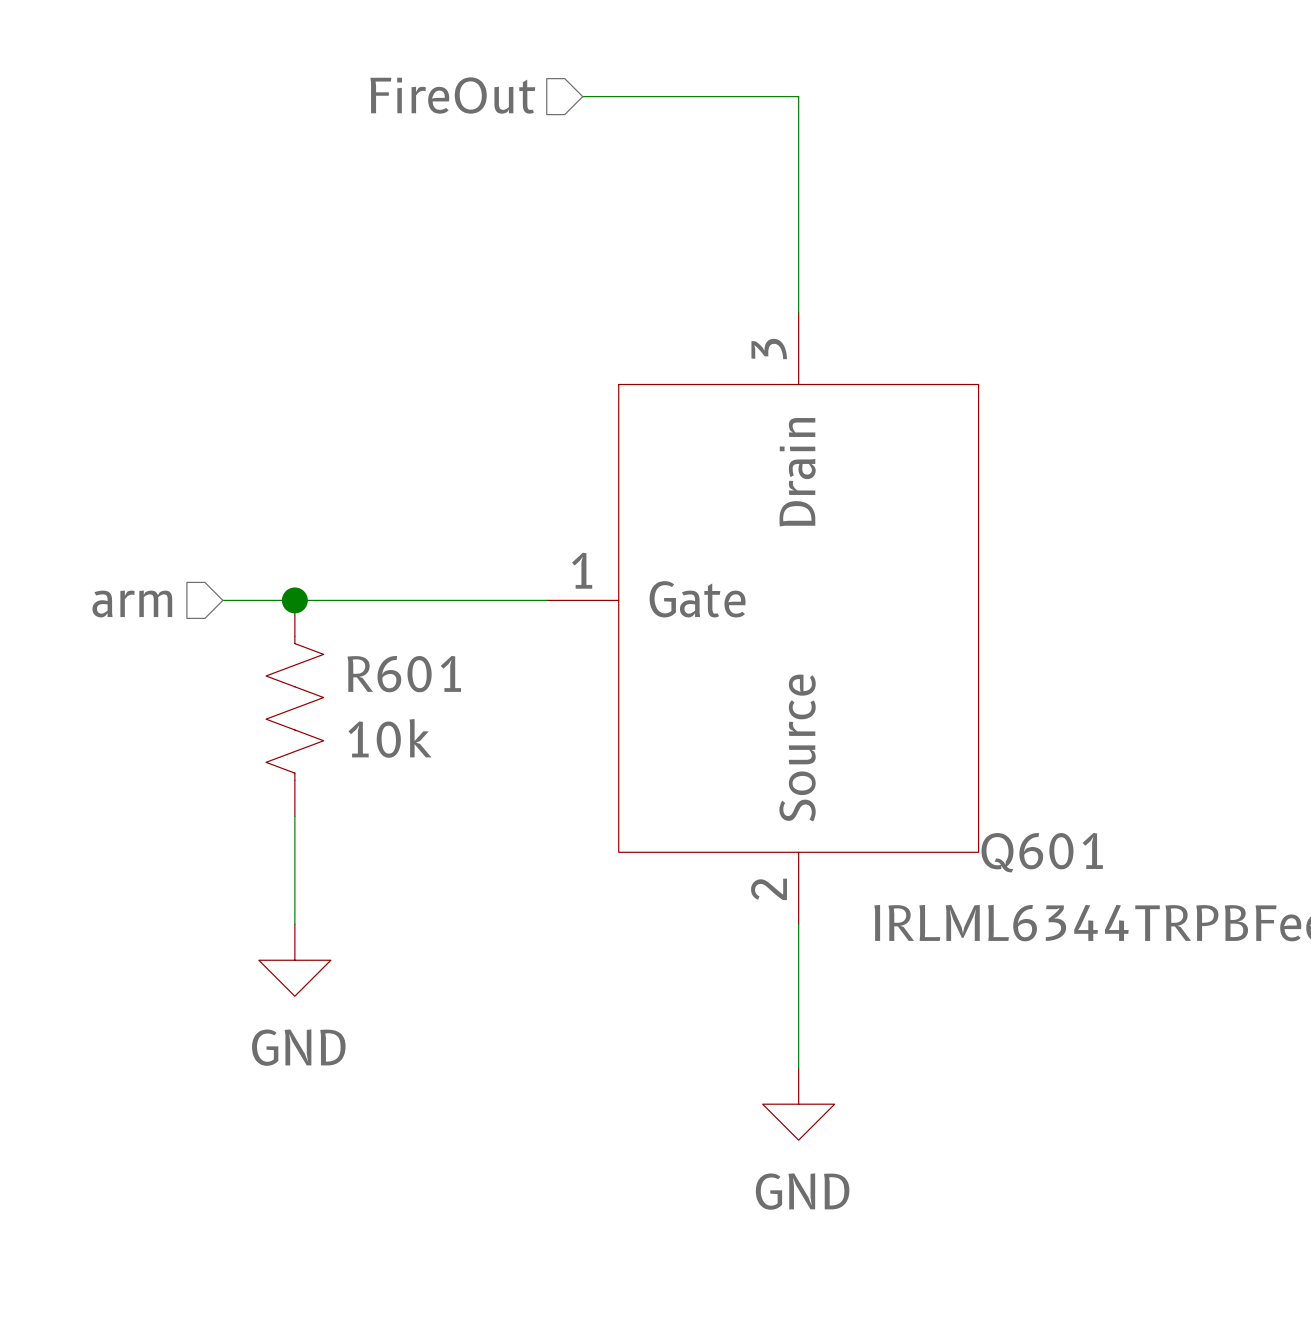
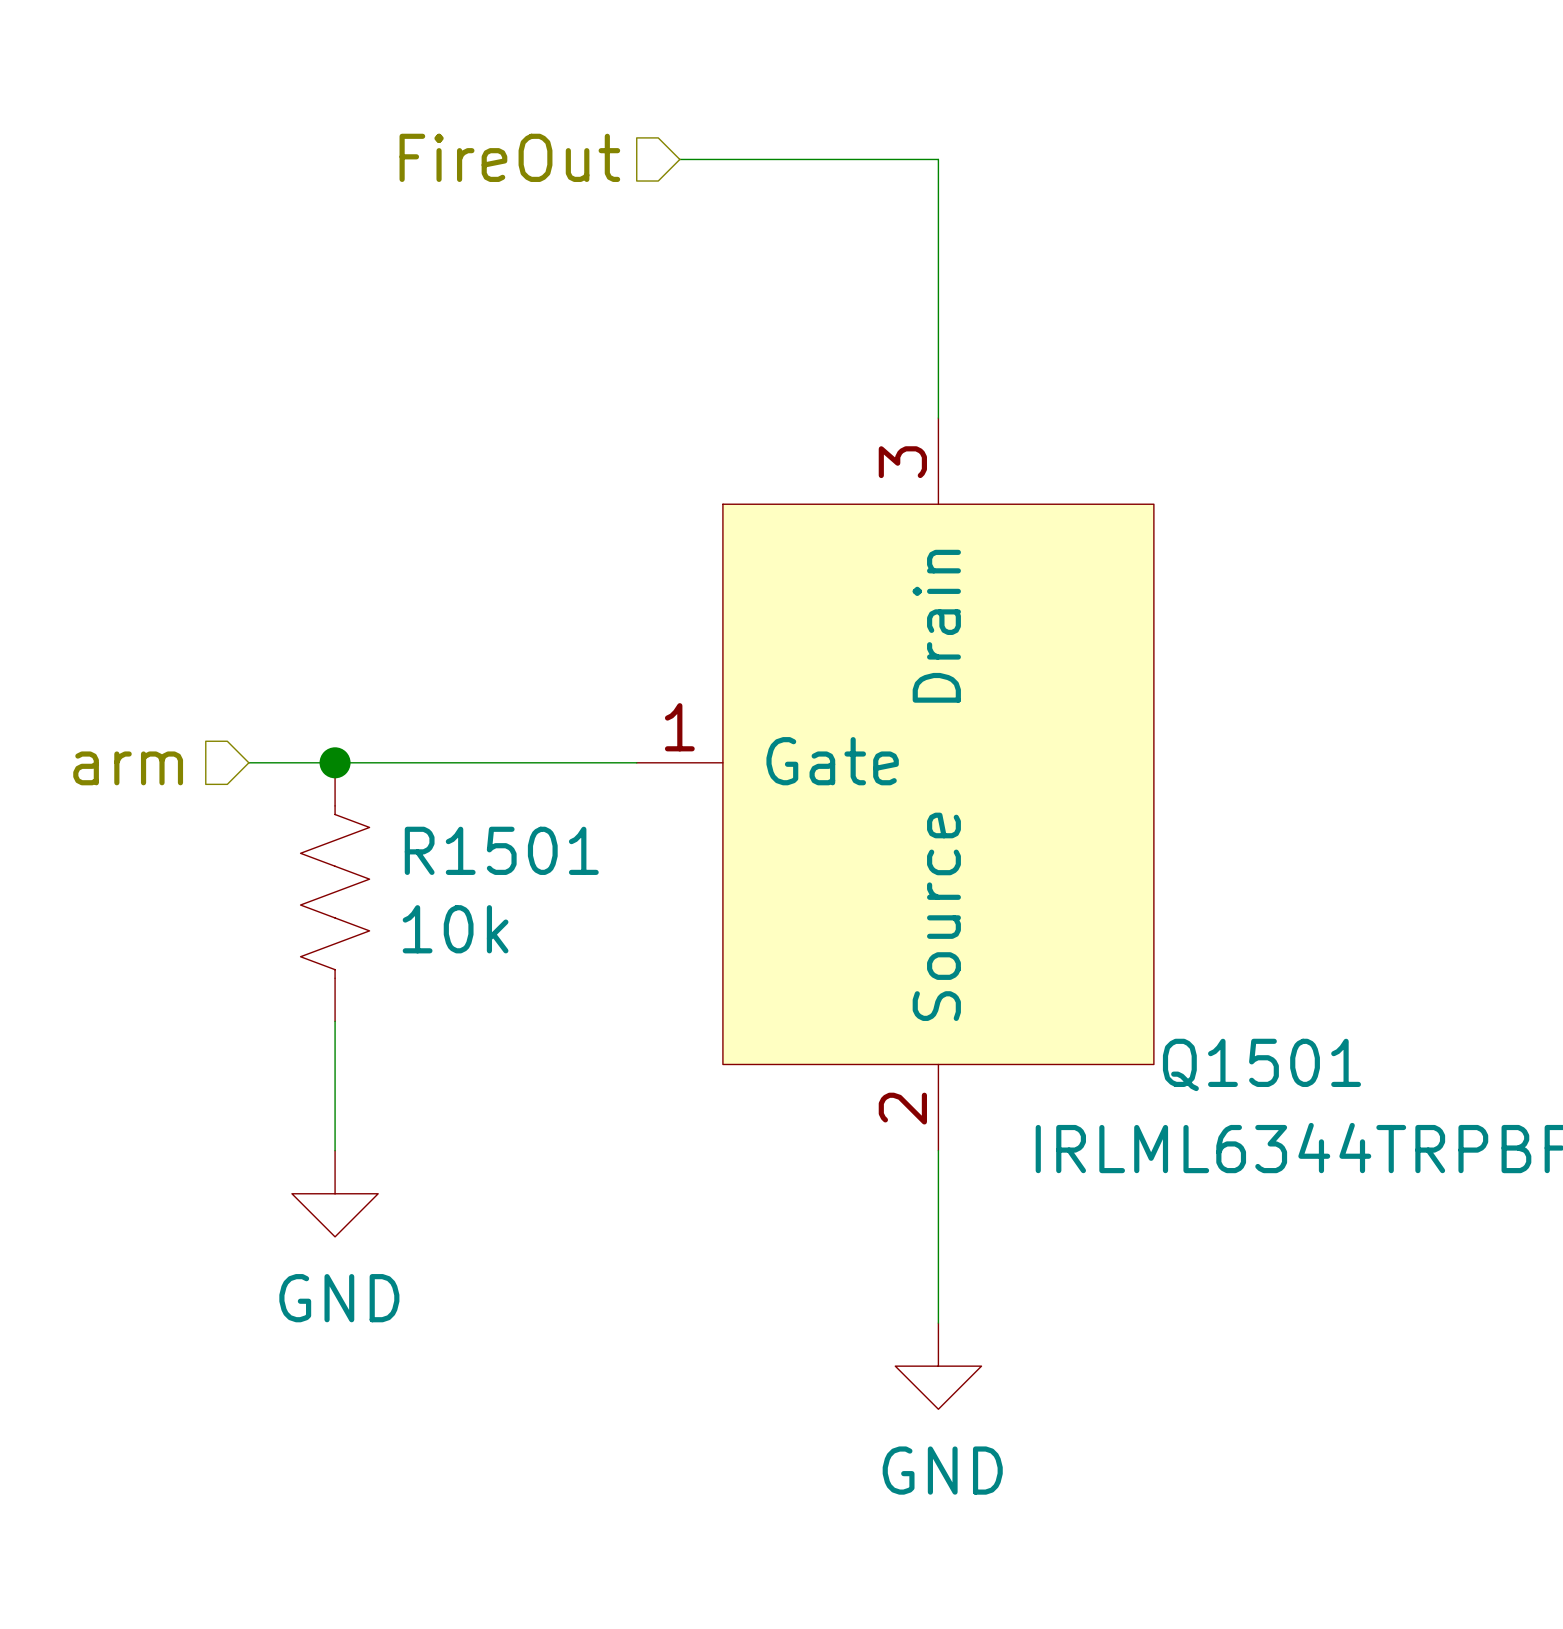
R601 name: R601 (404, 674) -> R1501 (501, 850)
Q601 name: Q601 (1042, 852) -> Q1501 (1261, 1064)

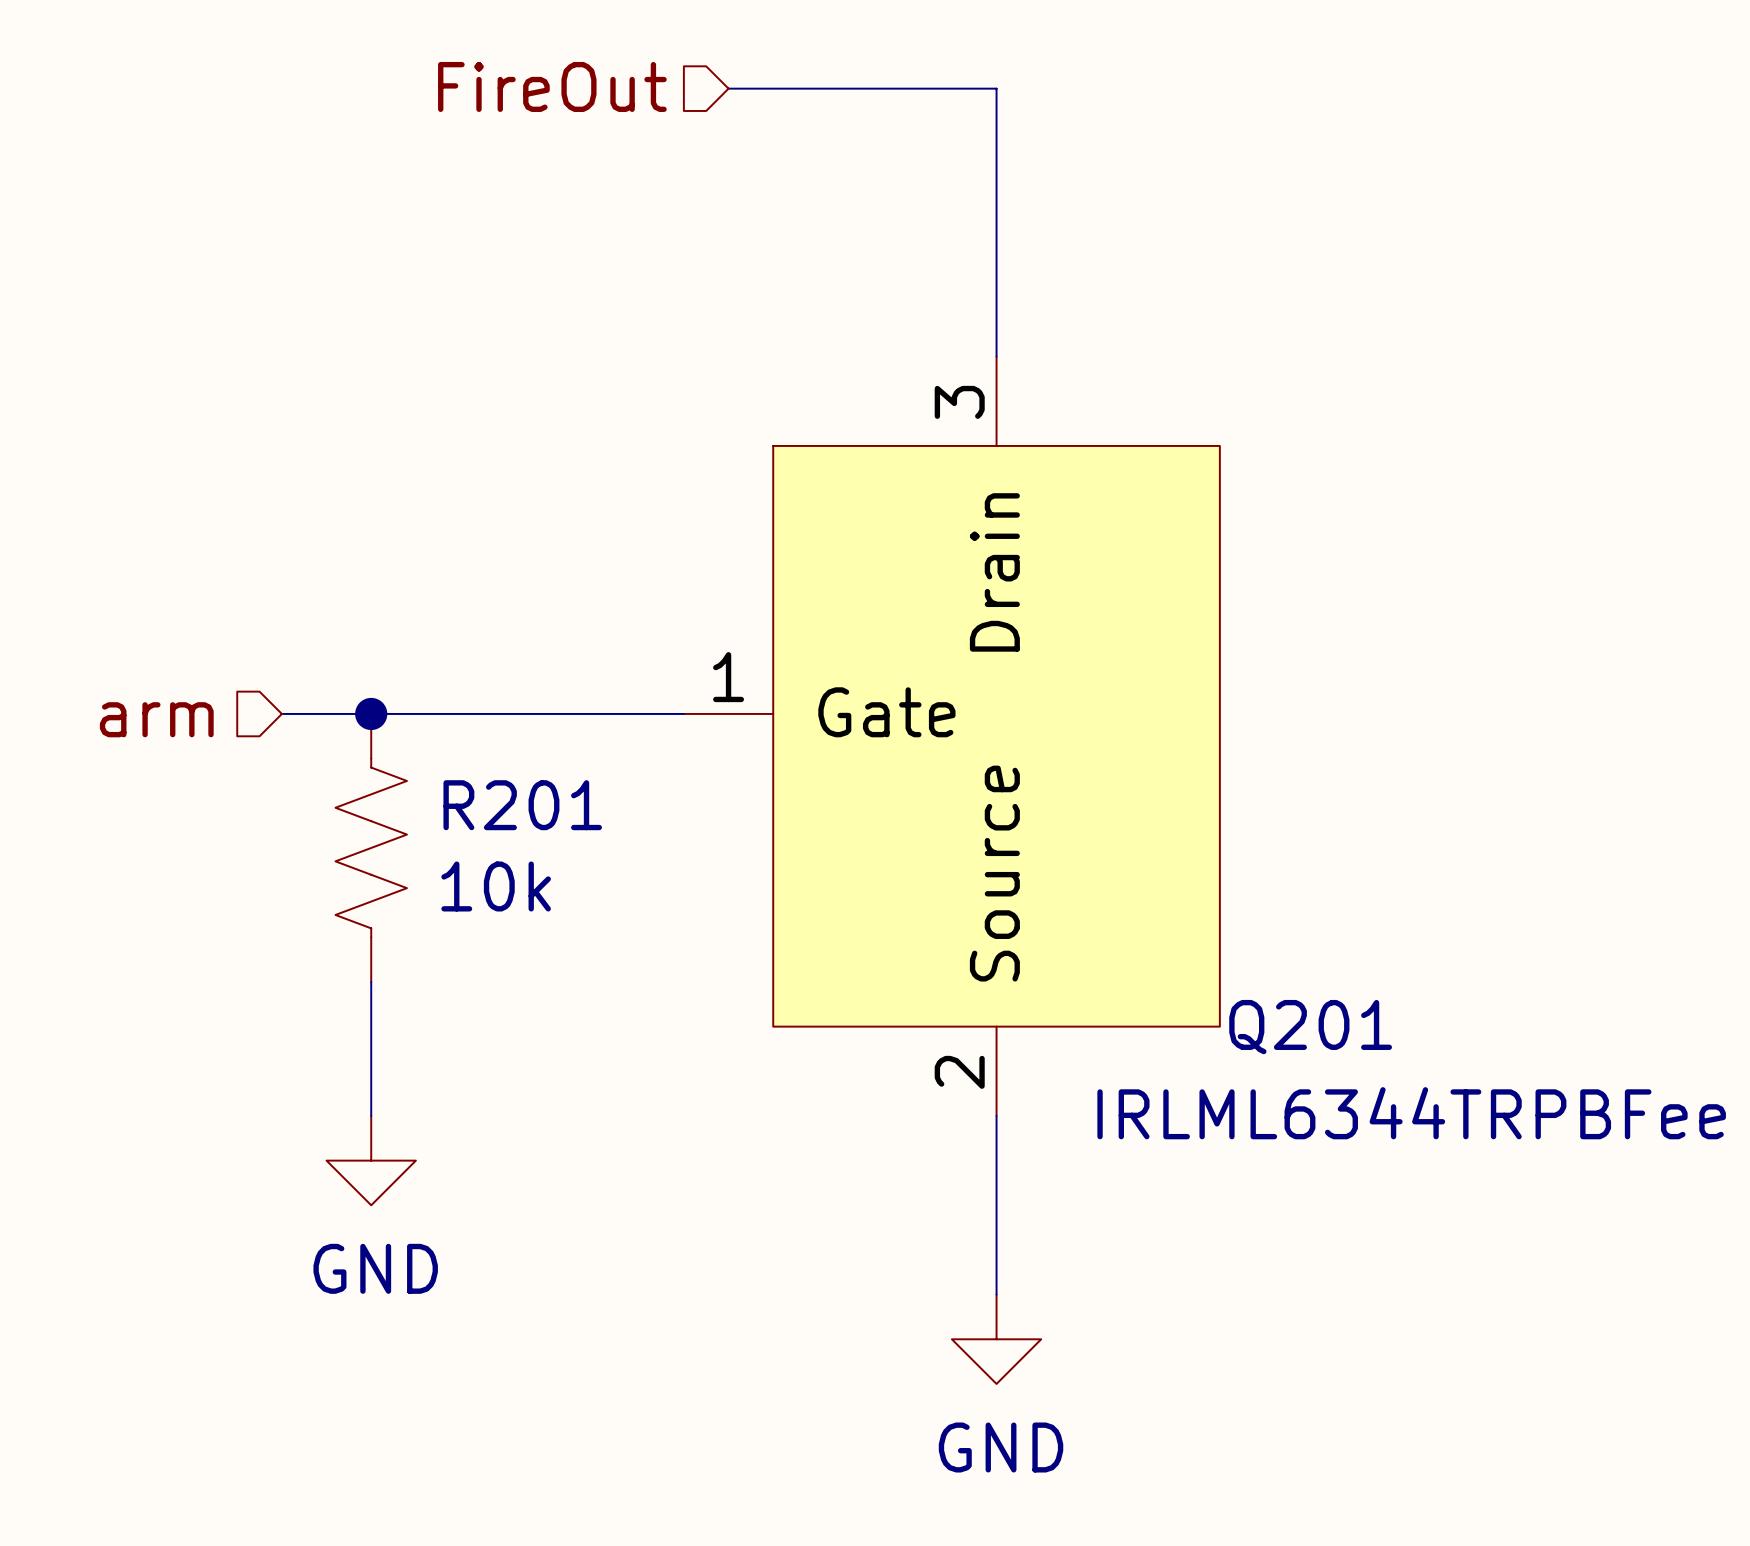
R1501 name: R1501 (501, 850) -> R201 (522, 805)
Q1501 name: Q1501 (1261, 1064) -> Q201 (1310, 1027)

